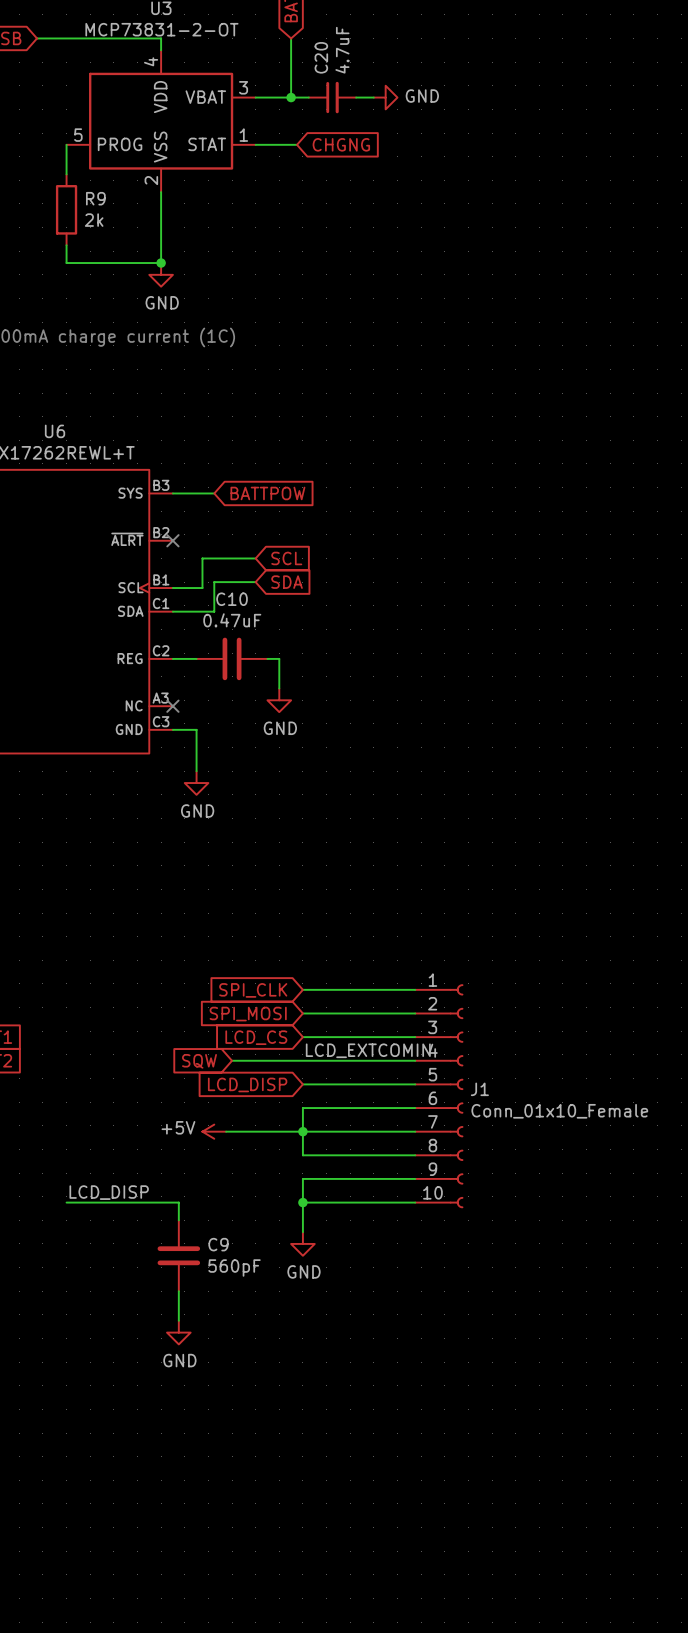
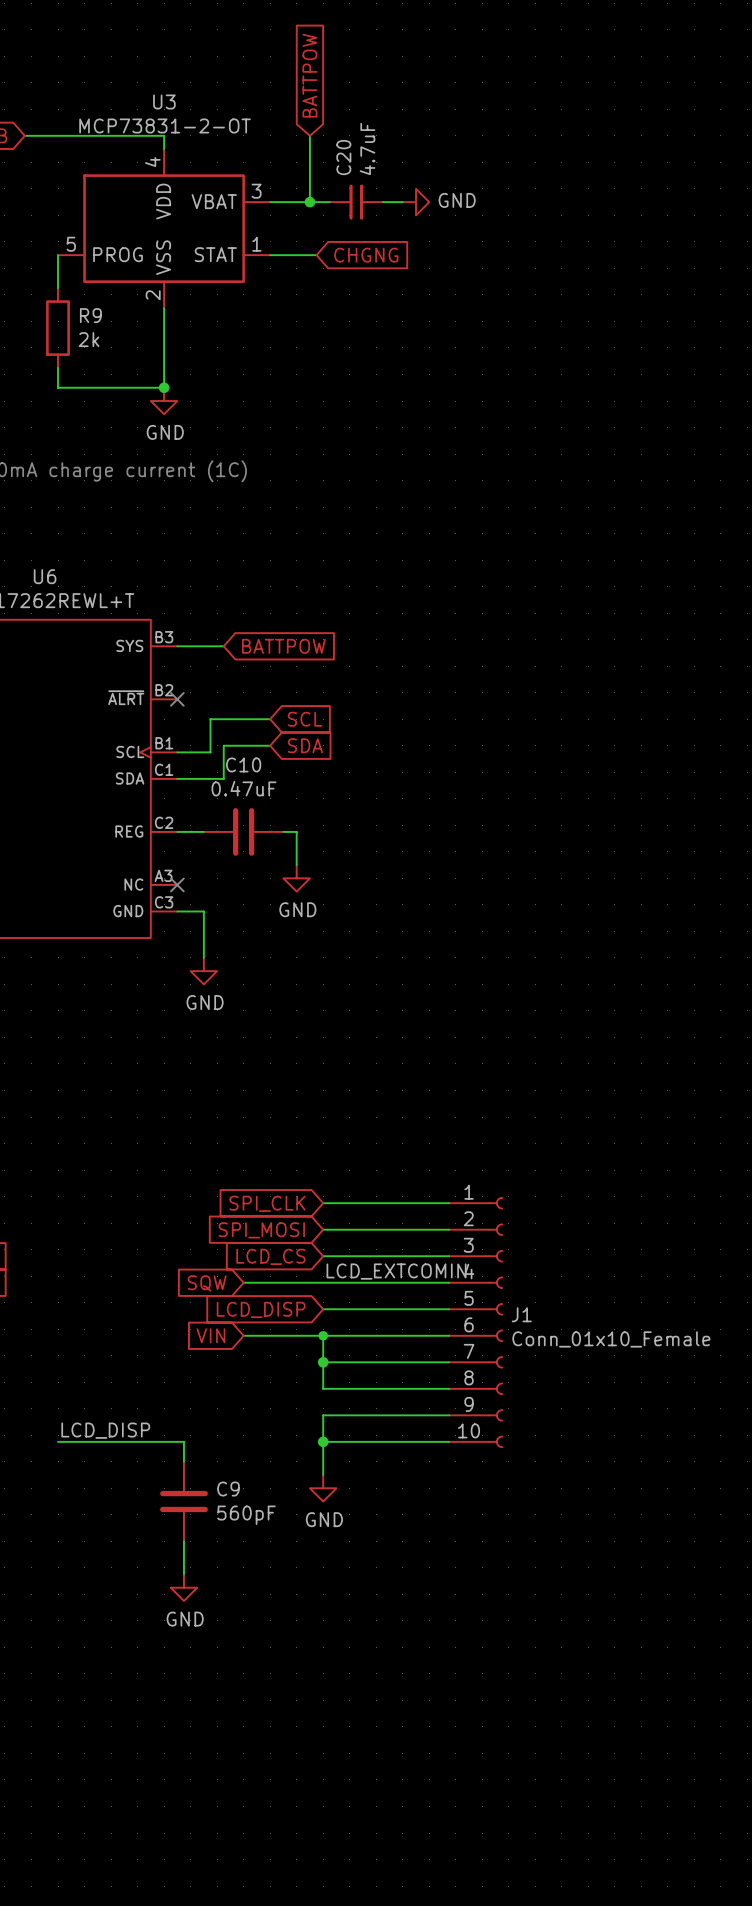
global label: none -> VIN (210, 1335)
wire: none -> (243, 1335) (323, 1335)
junction: none -> (323, 1335)
power symbol: +5V (214, 1131) -> none
wire: (226, 1131) (302, 1131) -> none

